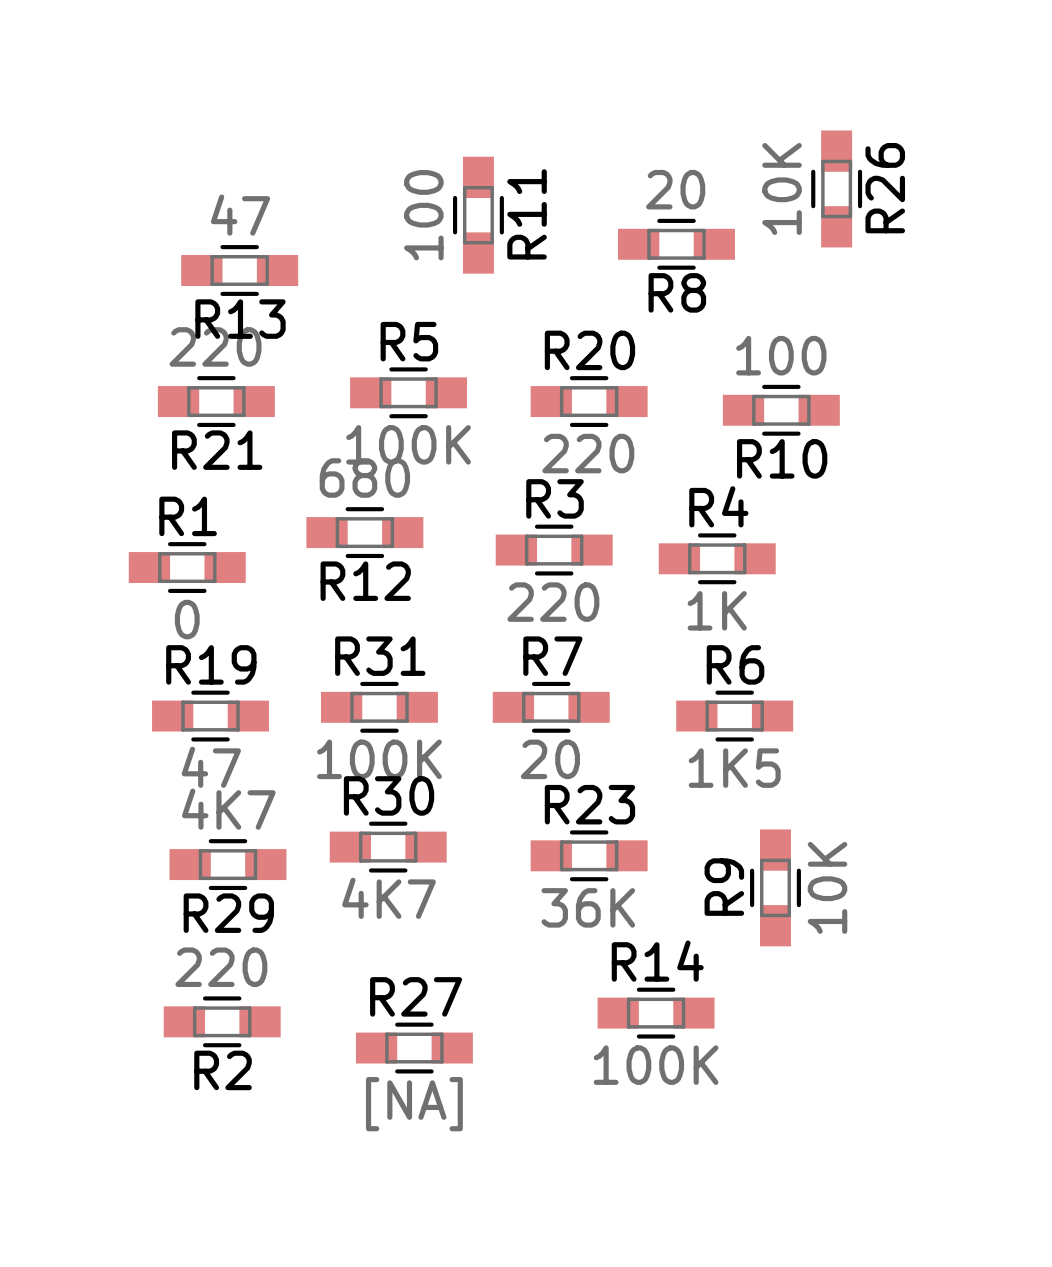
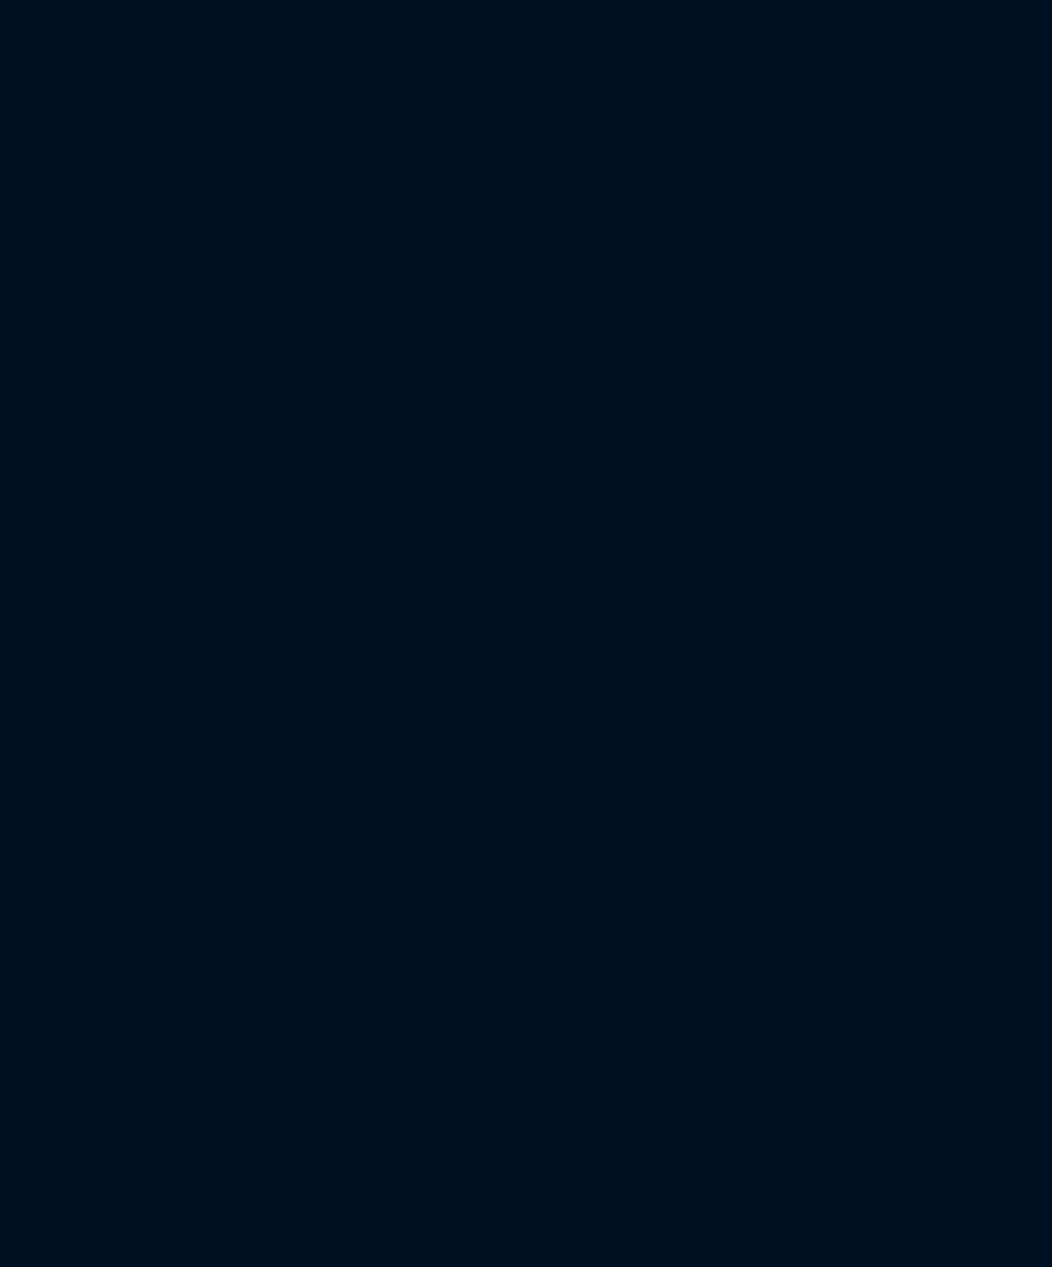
R26: 10K (836, 188) -> none
R11: 100 (478, 215) -> none
R8: 20 (676, 244) -> none
R13: 47 (239, 270) -> none
R5: 100K (408, 392) -> none
R21: 220 (216, 401) -> none
R20: 220 (589, 401) -> none
R10: 100 (781, 410) -> none
R12: 680 (364, 532) -> none
R3: 220 (554, 550) -> none
R4: 1K (717, 558) -> none
R1: 0 (187, 567) -> none
R31: 100K (379, 707) -> none
R7: 20 (551, 707) -> none
R19: 47 (210, 716) -> none
R6: 1K5 (734, 716) -> none
R30: 4K7 (388, 847) -> none
R23: 36K (589, 855) -> none
R29: 4K7 (227, 864) -> none
R9: 10K (775, 887) -> none
R14: 100K (656, 1013) -> none
R2: 220 (222, 1021) -> none
R27: [NA] (414, 1048) -> none

